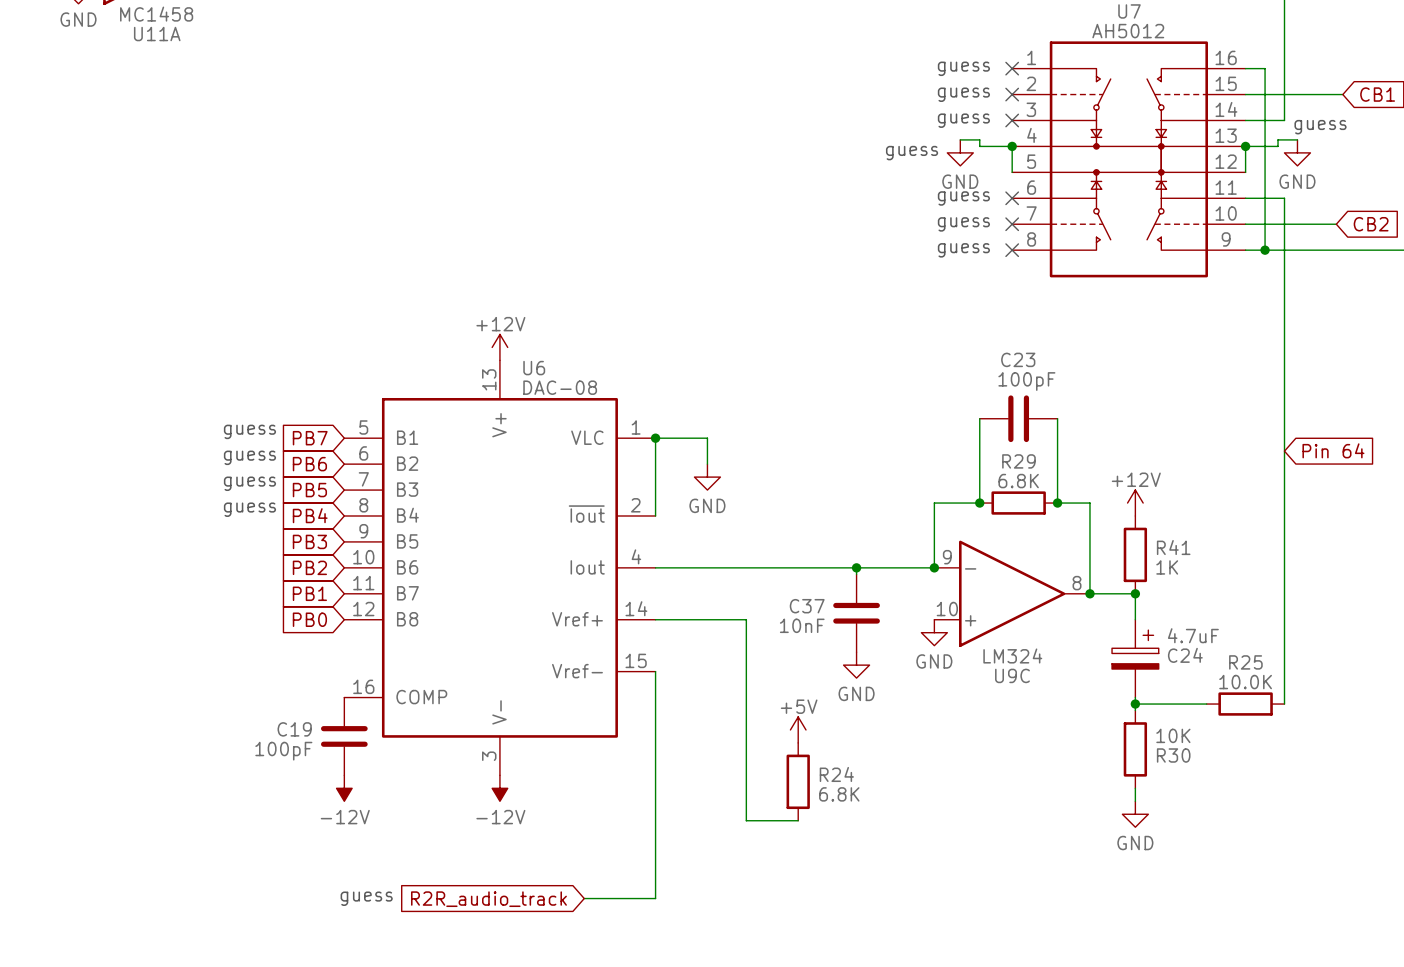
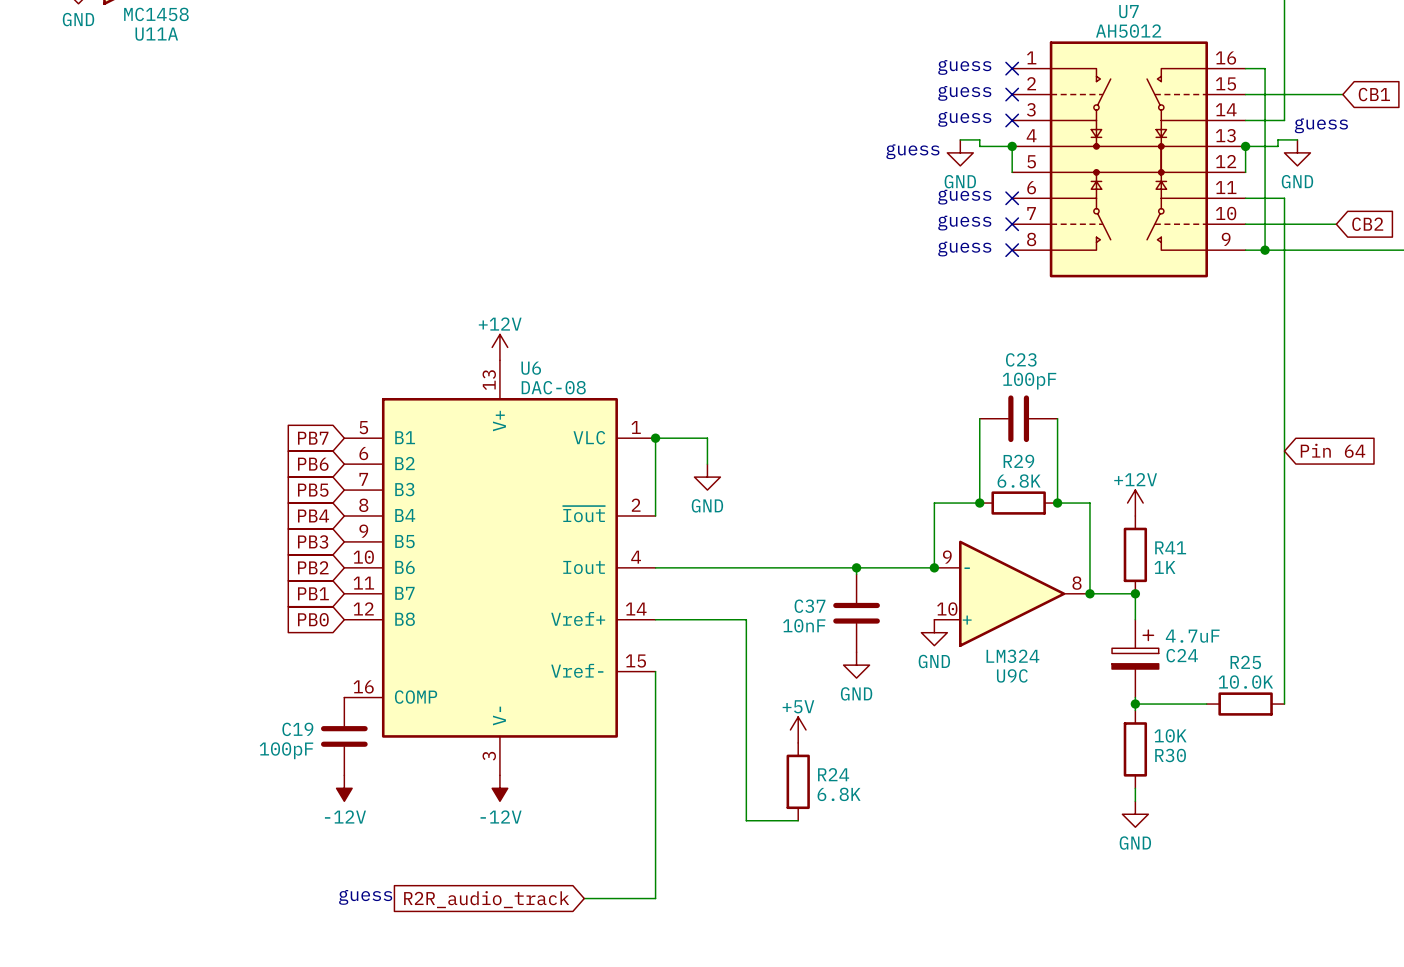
text: guess (249, 431) -> none
text: guess (249, 457) -> none
text: guess (249, 483) -> none
text: guess (249, 509) -> none

